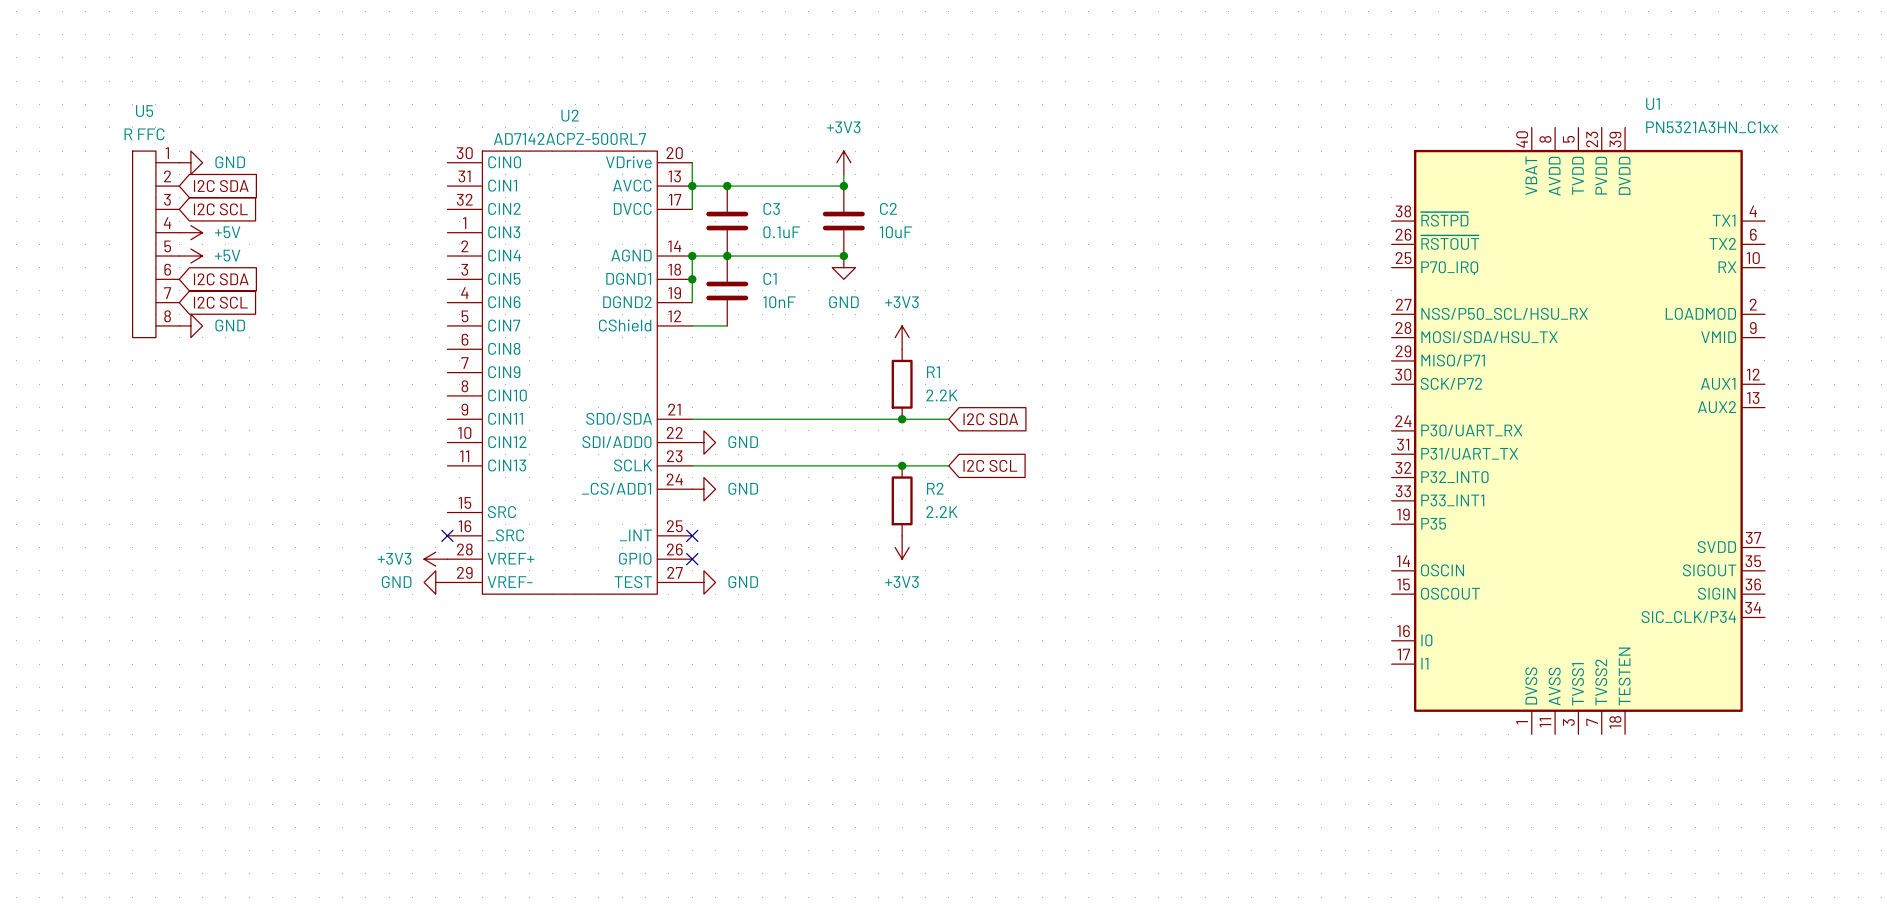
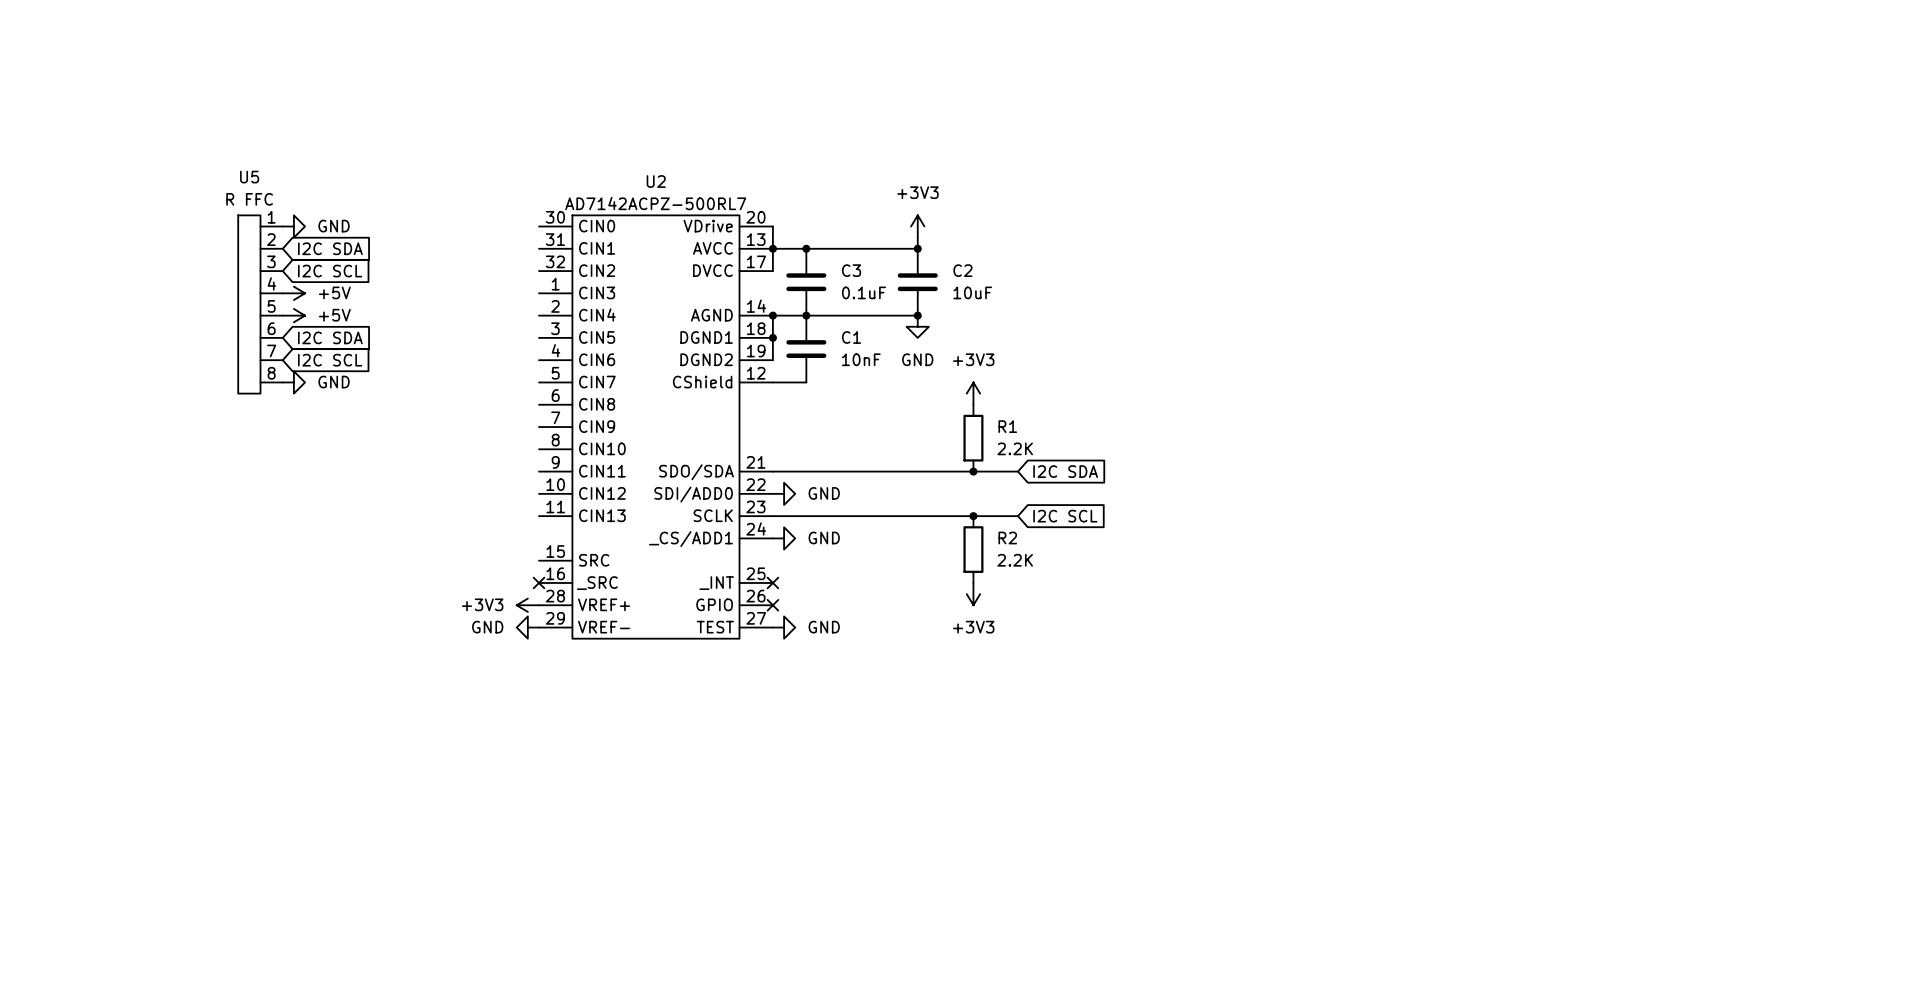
U1: PN5321A3HN_C1xx (1578, 430) -> none

